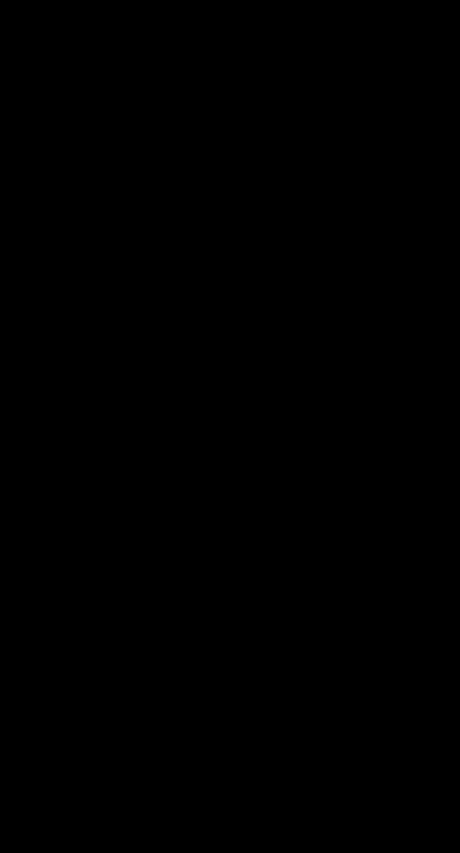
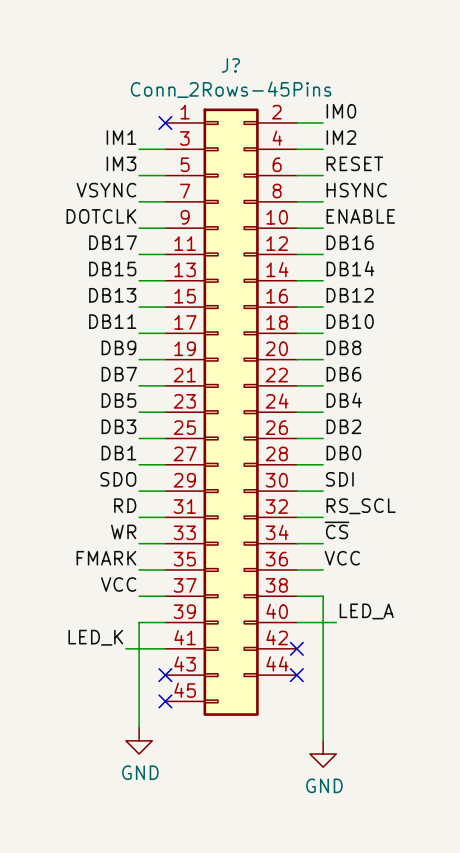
label: none -> IM0 (341, 111)
no-connect mark: none -> (165, 122)
wire: none -> (296, 122) (323, 122)
label: none -> IM1 (121, 137)
label: none -> IM2 (341, 137)
wire: none -> (139, 149) (165, 149)
wire: none -> (296, 149) (323, 149)
label: none -> IM3 (121, 163)
label: none -> RESET (354, 163)
wire: none -> (139, 175) (165, 175)
wire: none -> (296, 175) (323, 175)
label: none -> VSYNC (106, 190)
label: none -> HSYNC (356, 190)
wire: none -> (139, 201) (165, 201)
wire: none -> (296, 201) (323, 201)
label: none -> DOTCLK (101, 216)
label: none -> ENABLE (360, 216)
wire: none -> (139, 228) (165, 228)
wire: none -> (296, 228) (323, 228)
label: none -> DB17 (113, 242)
label: none -> DB16 (350, 242)
wire: none -> (139, 254) (165, 254)
wire: none -> (296, 254) (323, 254)
label: none -> DB15 (112, 269)
label: none -> DB14 (350, 268)
wire: none -> (139, 280) (165, 280)
wire: none -> (296, 280) (323, 280)
label: none -> DB13 (112, 295)
label: none -> DB12 (350, 295)
wire: none -> (139, 307) (165, 307)
wire: none -> (296, 307) (323, 307)
label: none -> DB11 (112, 321)
label: none -> DB10 (350, 321)
wire: none -> (139, 333) (165, 333)
wire: none -> (296, 333) (323, 333)
label: none -> DB9 (118, 347)
label: none -> DB8 (343, 347)
wire: none -> (139, 359) (165, 359)
wire: none -> (296, 359) (323, 359)
label: none -> DB7 (119, 374)
label: none -> DB6 (343, 374)
wire: none -> (139, 385) (165, 385)
wire: none -> (296, 385) (323, 385)
label: none -> DB5 (118, 400)
label: none -> DB4 (344, 400)
wire: none -> (139, 412) (165, 412)
J?: none -> Conn_2Rows-45Pins (231, 412)
wire: none -> (296, 412) (323, 412)
label: none -> DB3 (118, 426)
label: none -> DB2 (343, 426)
wire: none -> (139, 438) (165, 438)
wire: none -> (296, 438) (323, 438)
label: none -> DB1 (118, 453)
label: none -> DB0 (343, 453)
wire: none -> (139, 464) (165, 464)
wire: none -> (296, 464) (323, 464)
label: none -> SDO (118, 479)
label: none -> SDI (339, 479)
wire: none -> (139, 491) (165, 491)
wire: none -> (296, 491) (323, 491)
label: none -> RD (125, 505)
label: none -> RS_SCL (361, 506)
wire: none -> (139, 517) (165, 517)
wire: none -> (296, 517) (323, 517)
label: none -> ~{CS} (337, 530)
label: none -> WR (123, 531)
wire: none -> (139, 543) (165, 543)
wire: none -> (296, 543) (323, 543)
label: none -> FMARK (106, 558)
label: none -> VCC (342, 558)
wire: none -> (139, 569) (165, 569)
wire: none -> (296, 569) (323, 569)
label: none -> VCC (118, 584)
wire: none -> (139, 596) (165, 596)
wire: none -> (296, 596) (323, 596) (323, 740)
label: none -> LED_A (366, 611)
wire: none -> (165, 622) (139, 622) (139, 727)
wire: none -> (296, 622) (336, 622)
label: none -> LED_K (95, 637)
wire: none -> (125, 648) (165, 648)
no-connect mark: none -> (296, 648)
no-connect mark: none -> (165, 675)
no-connect mark: none -> (296, 675)
no-connect mark: none -> (165, 701)
power symbol: none -> GND (139, 740)
power symbol: none -> GND (323, 754)

